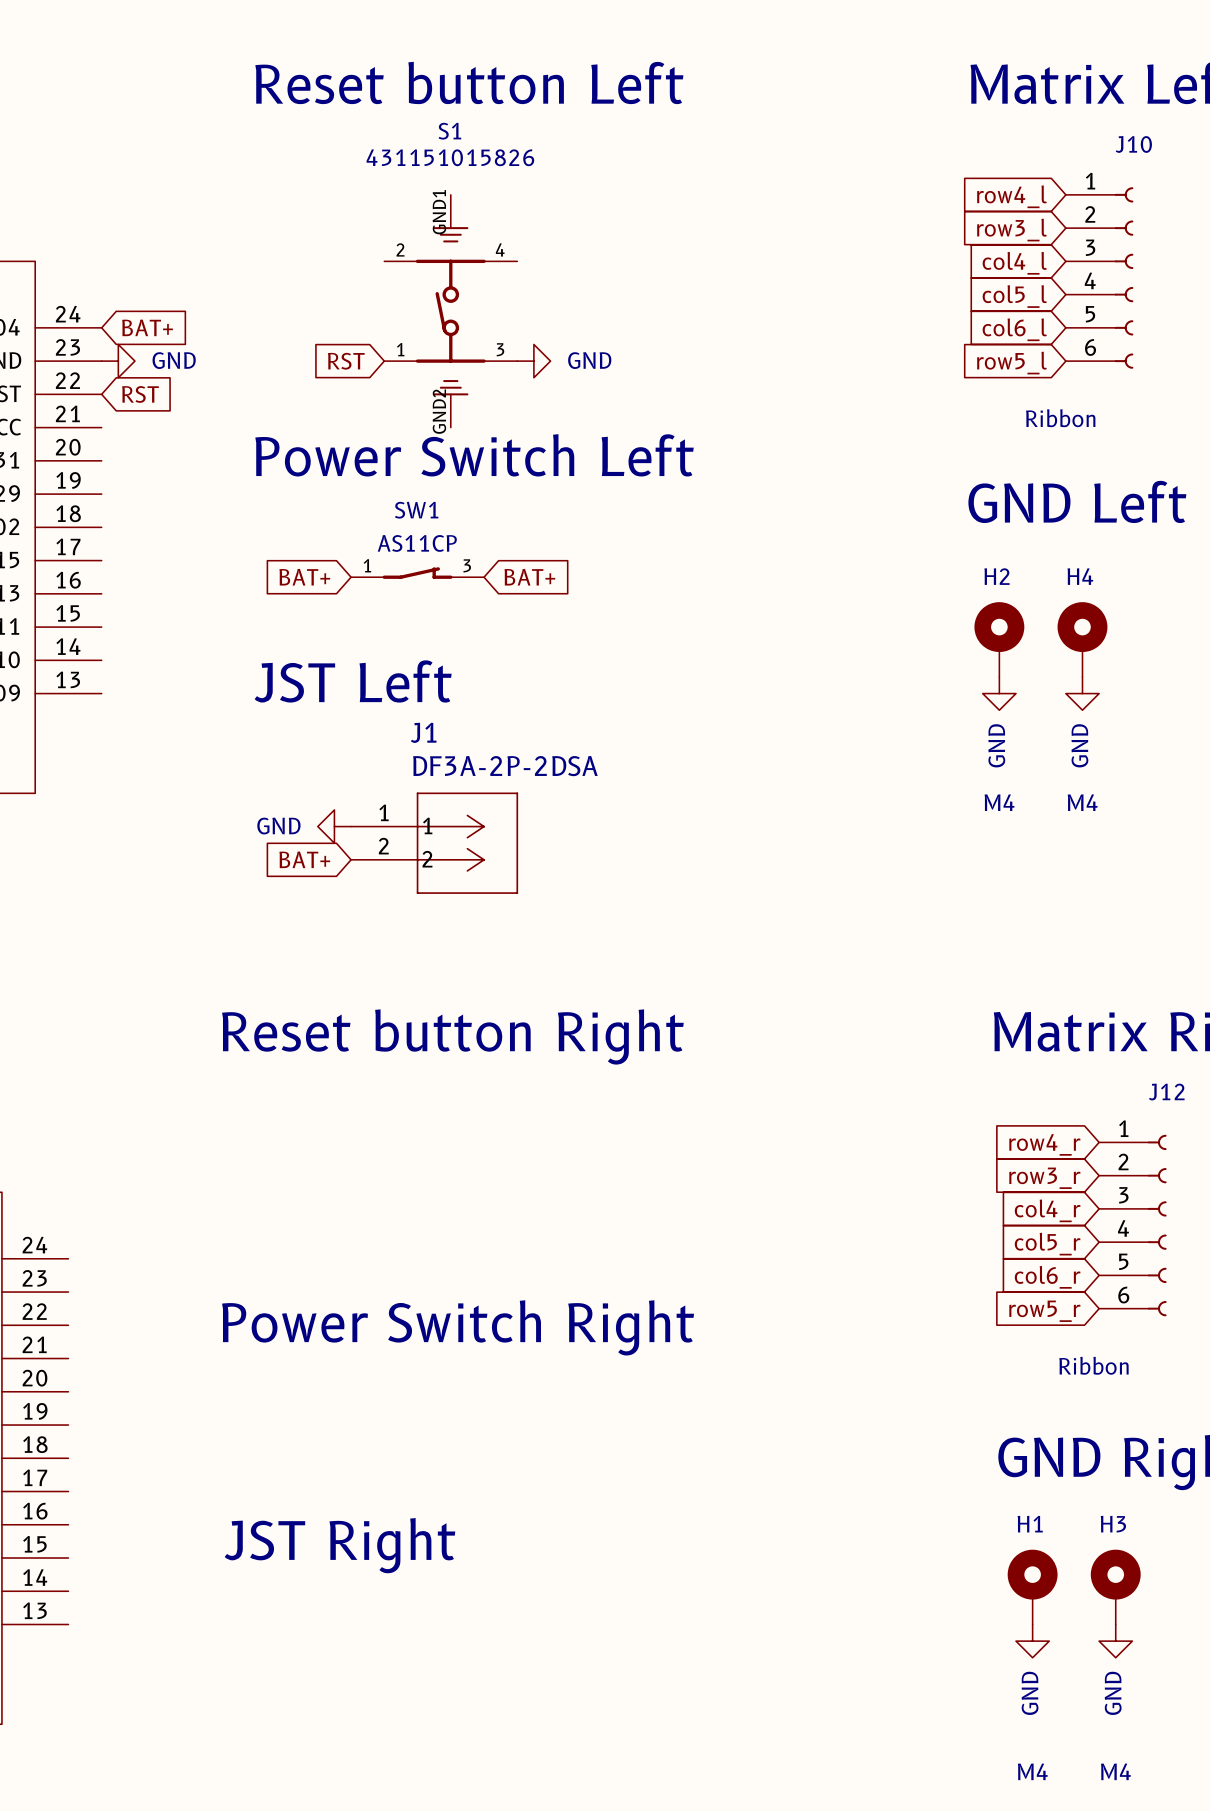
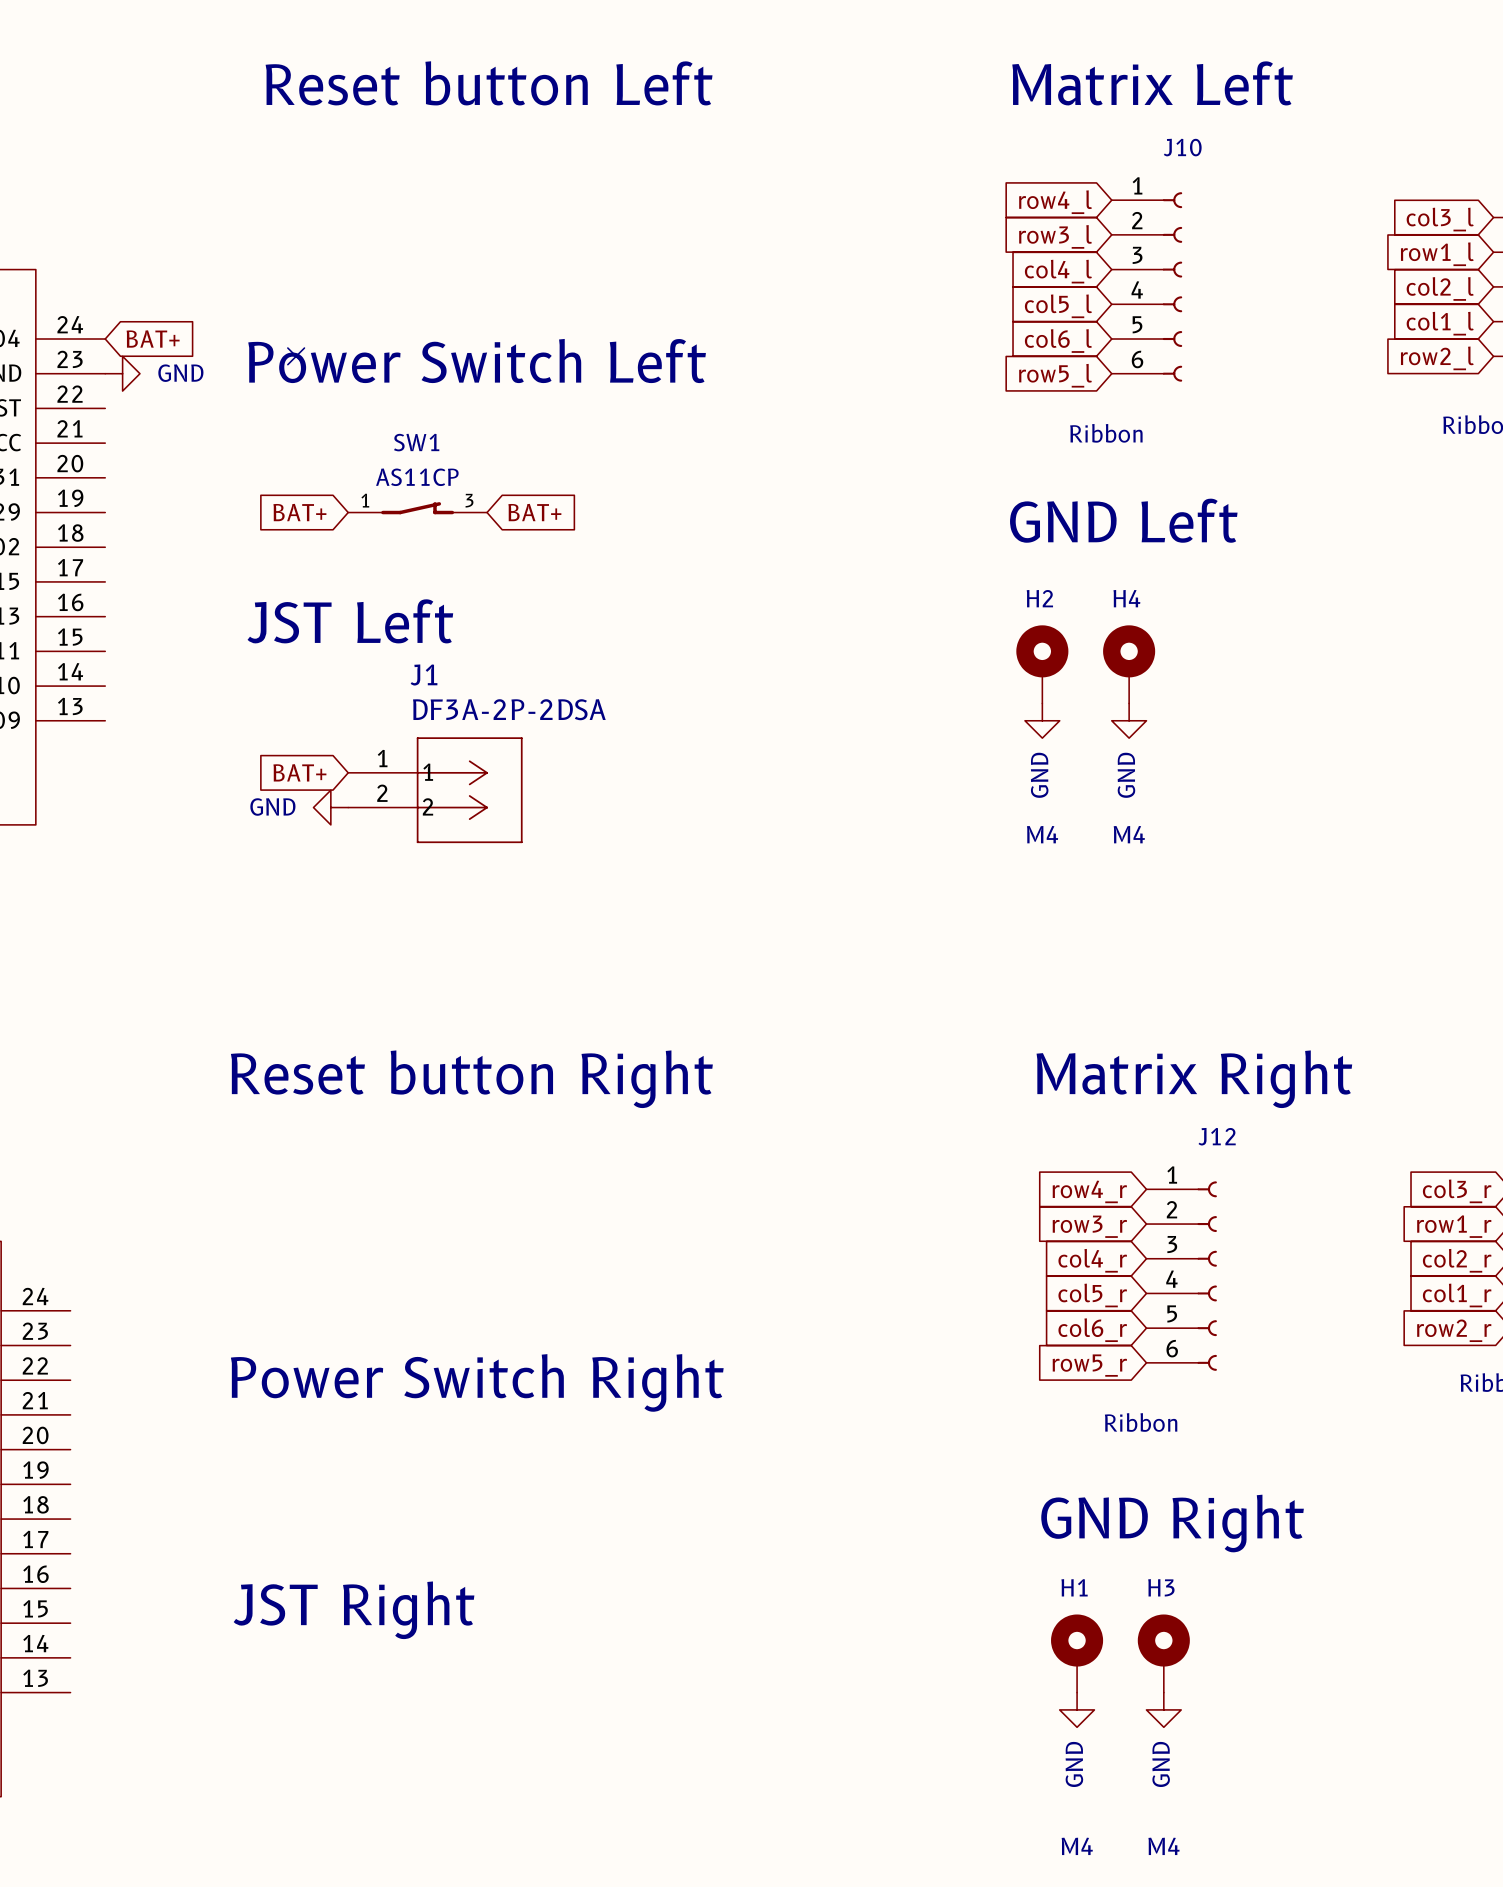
S1: 431151015826 (450, 311) -> none
no-connect mark: none -> (296, 356)
global label: RST (346, 361) -> none
power symbol: GND (533, 361) -> none
global label: RST (140, 394) -> none
text position: Power Switch Left (474, 455) -> Power Switch Left (477, 361)
global label: none -> BAT+ (299, 512)
global label: none -> BAT+ (534, 512)
SW1 position: (417, 573) -> (417, 508)
global label: BAT+ (304, 577) -> none
global label: BAT+ (529, 577) -> none
text position: JST Left (353, 681) -> JST Left (350, 621)
global label: none -> BAT+ (299, 772)
power symbol position: GND (334, 826) -> GND (330, 807)
J1 position: (434, 843) -> (435, 790)
global label: BAT+ (304, 859) -> none

